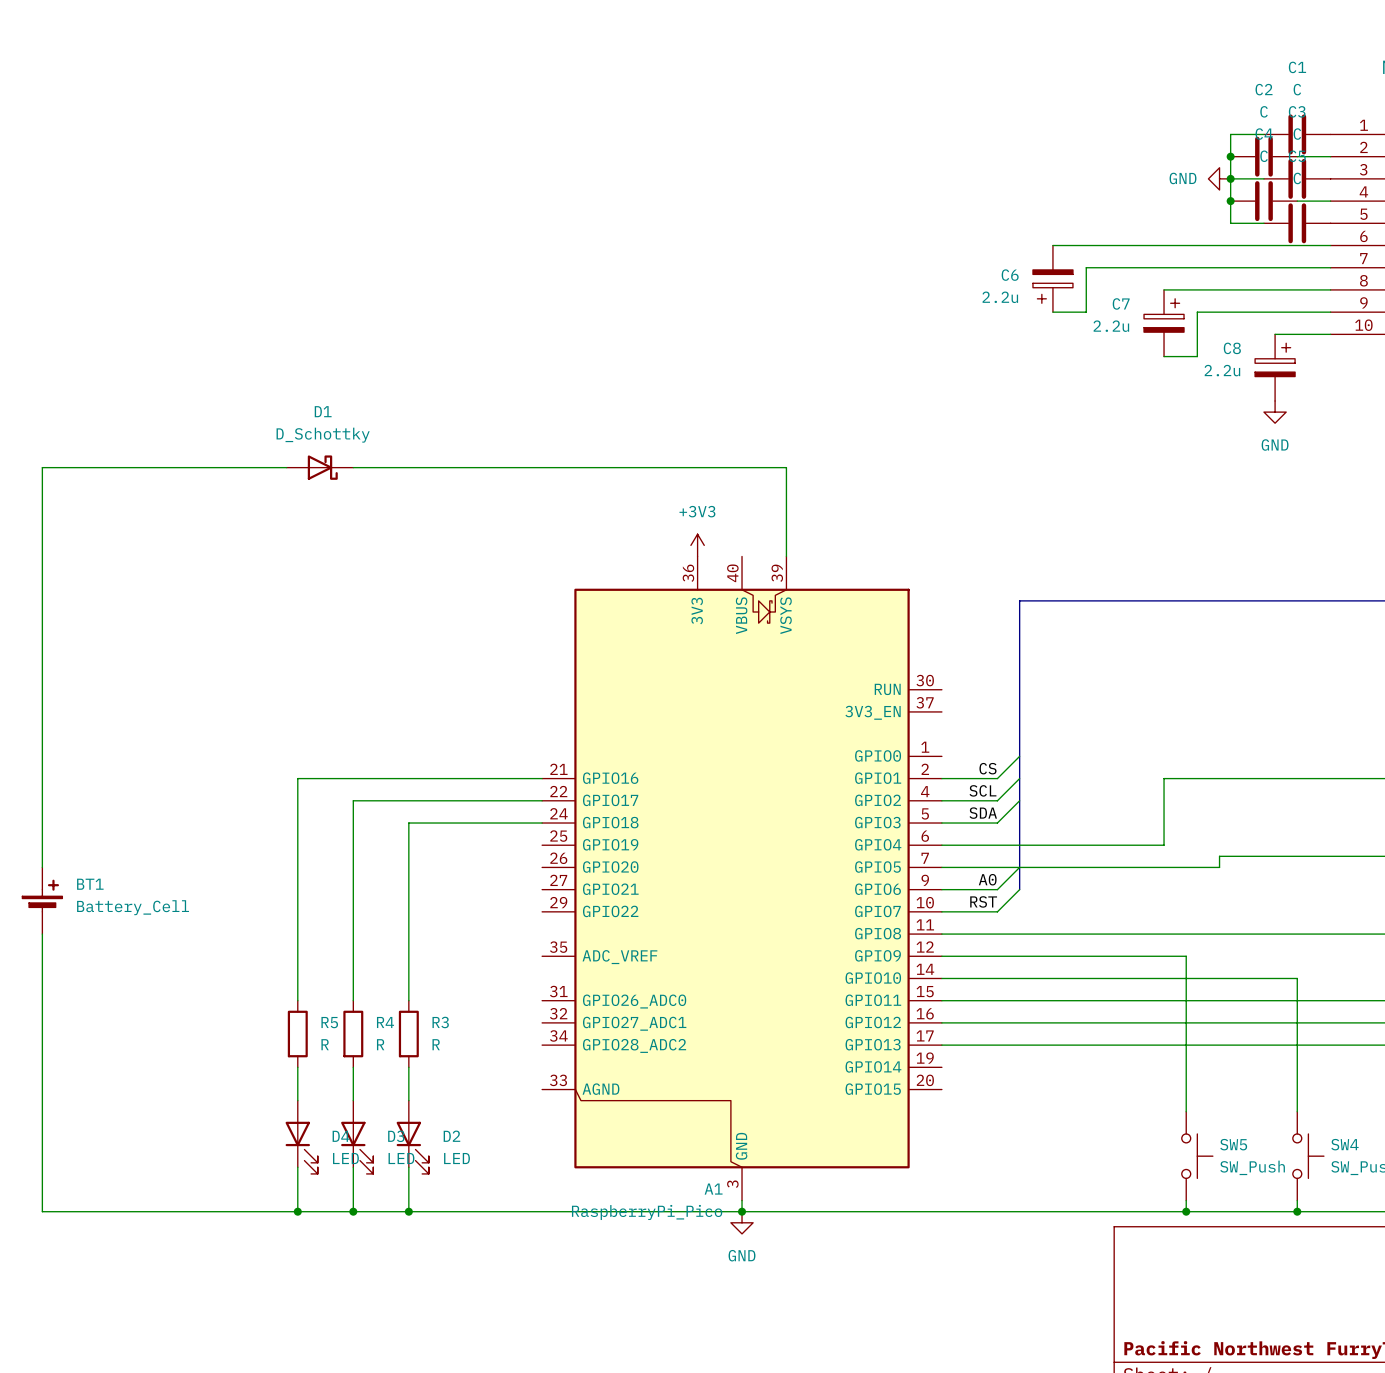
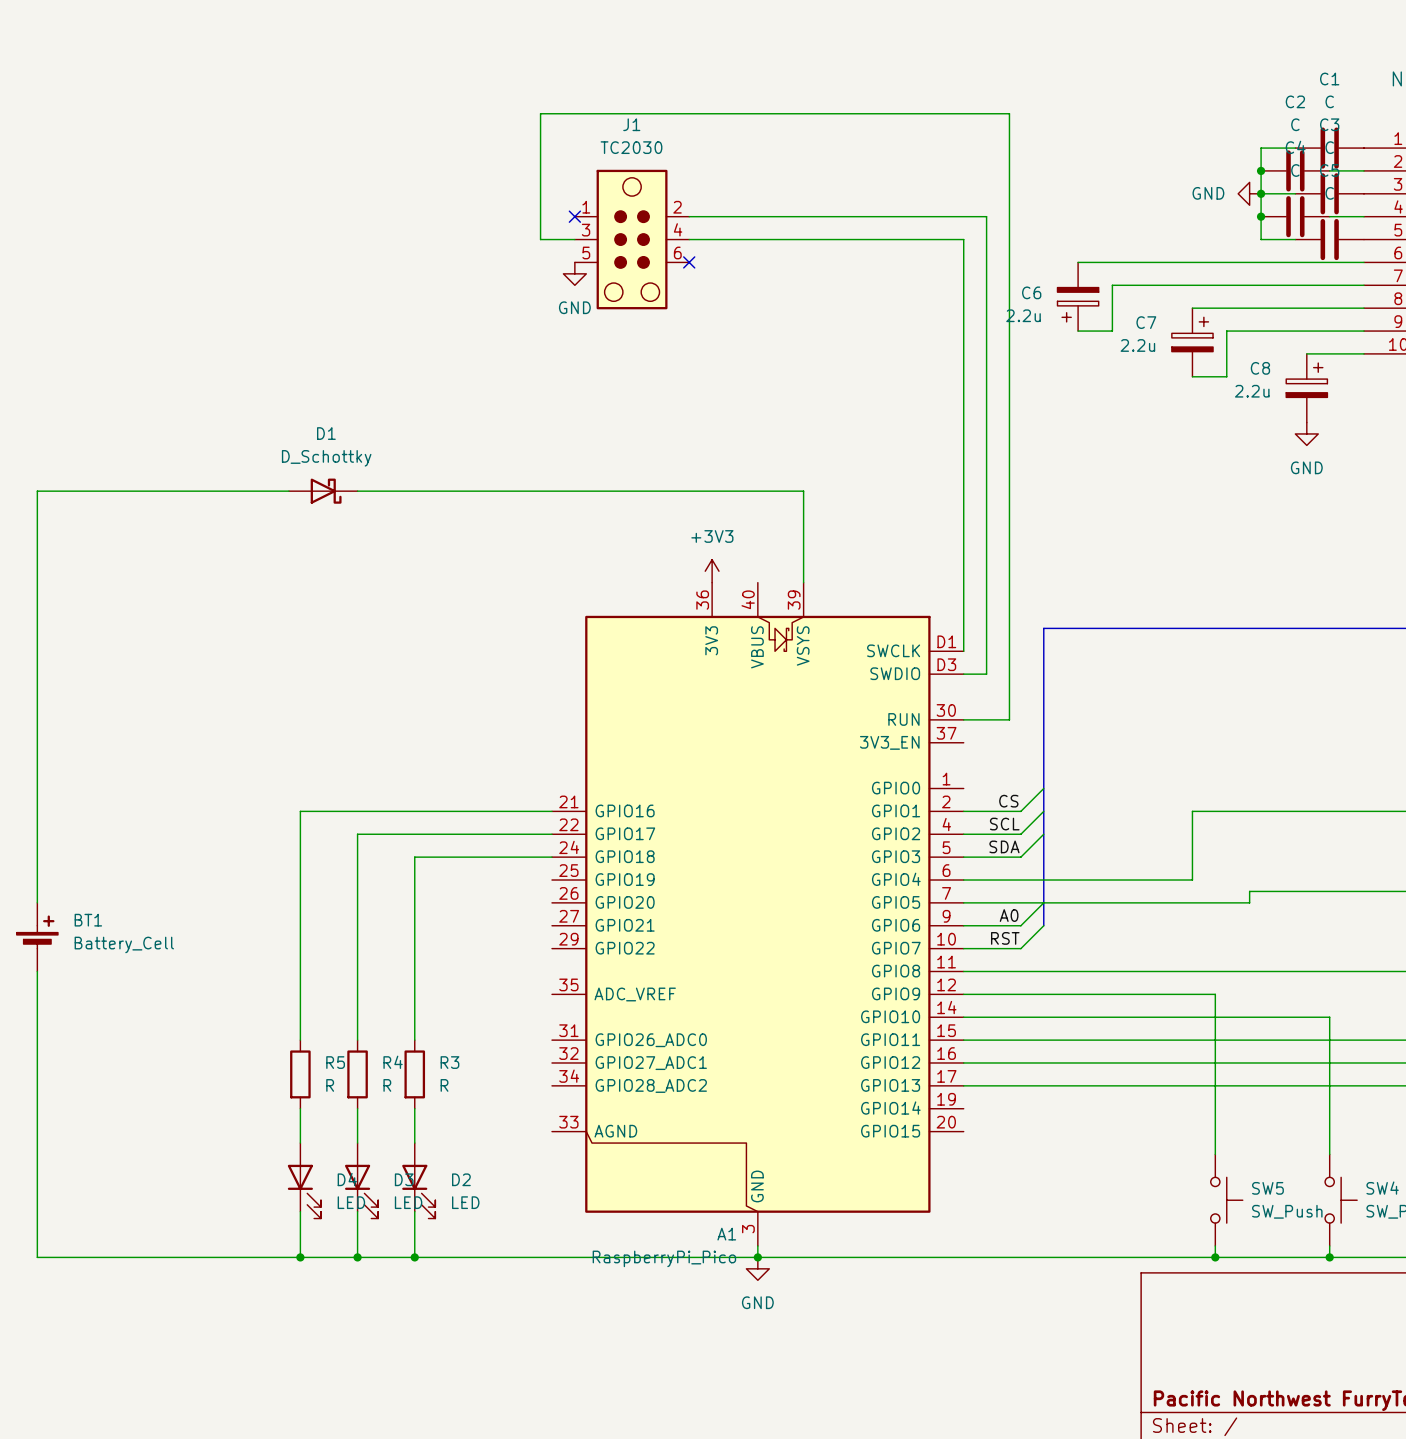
no-connect mark: none -> (574, 216)
wire: none -> (689, 216) (986, 216) (986, 674) (963, 674)
wire: none -> (574, 239) (540, 239) (540, 113) (1009, 113) (1009, 719) (963, 719)
J1: none -> TC2030 (632, 239)
wire: none -> (689, 239) (963, 239) (963, 651)
no-connect mark: none -> (689, 262)
power symbol: none -> GND (574, 273)
A1 symbol: [542, 556, 942, 1201] -> [551, 582, 964, 1246]

